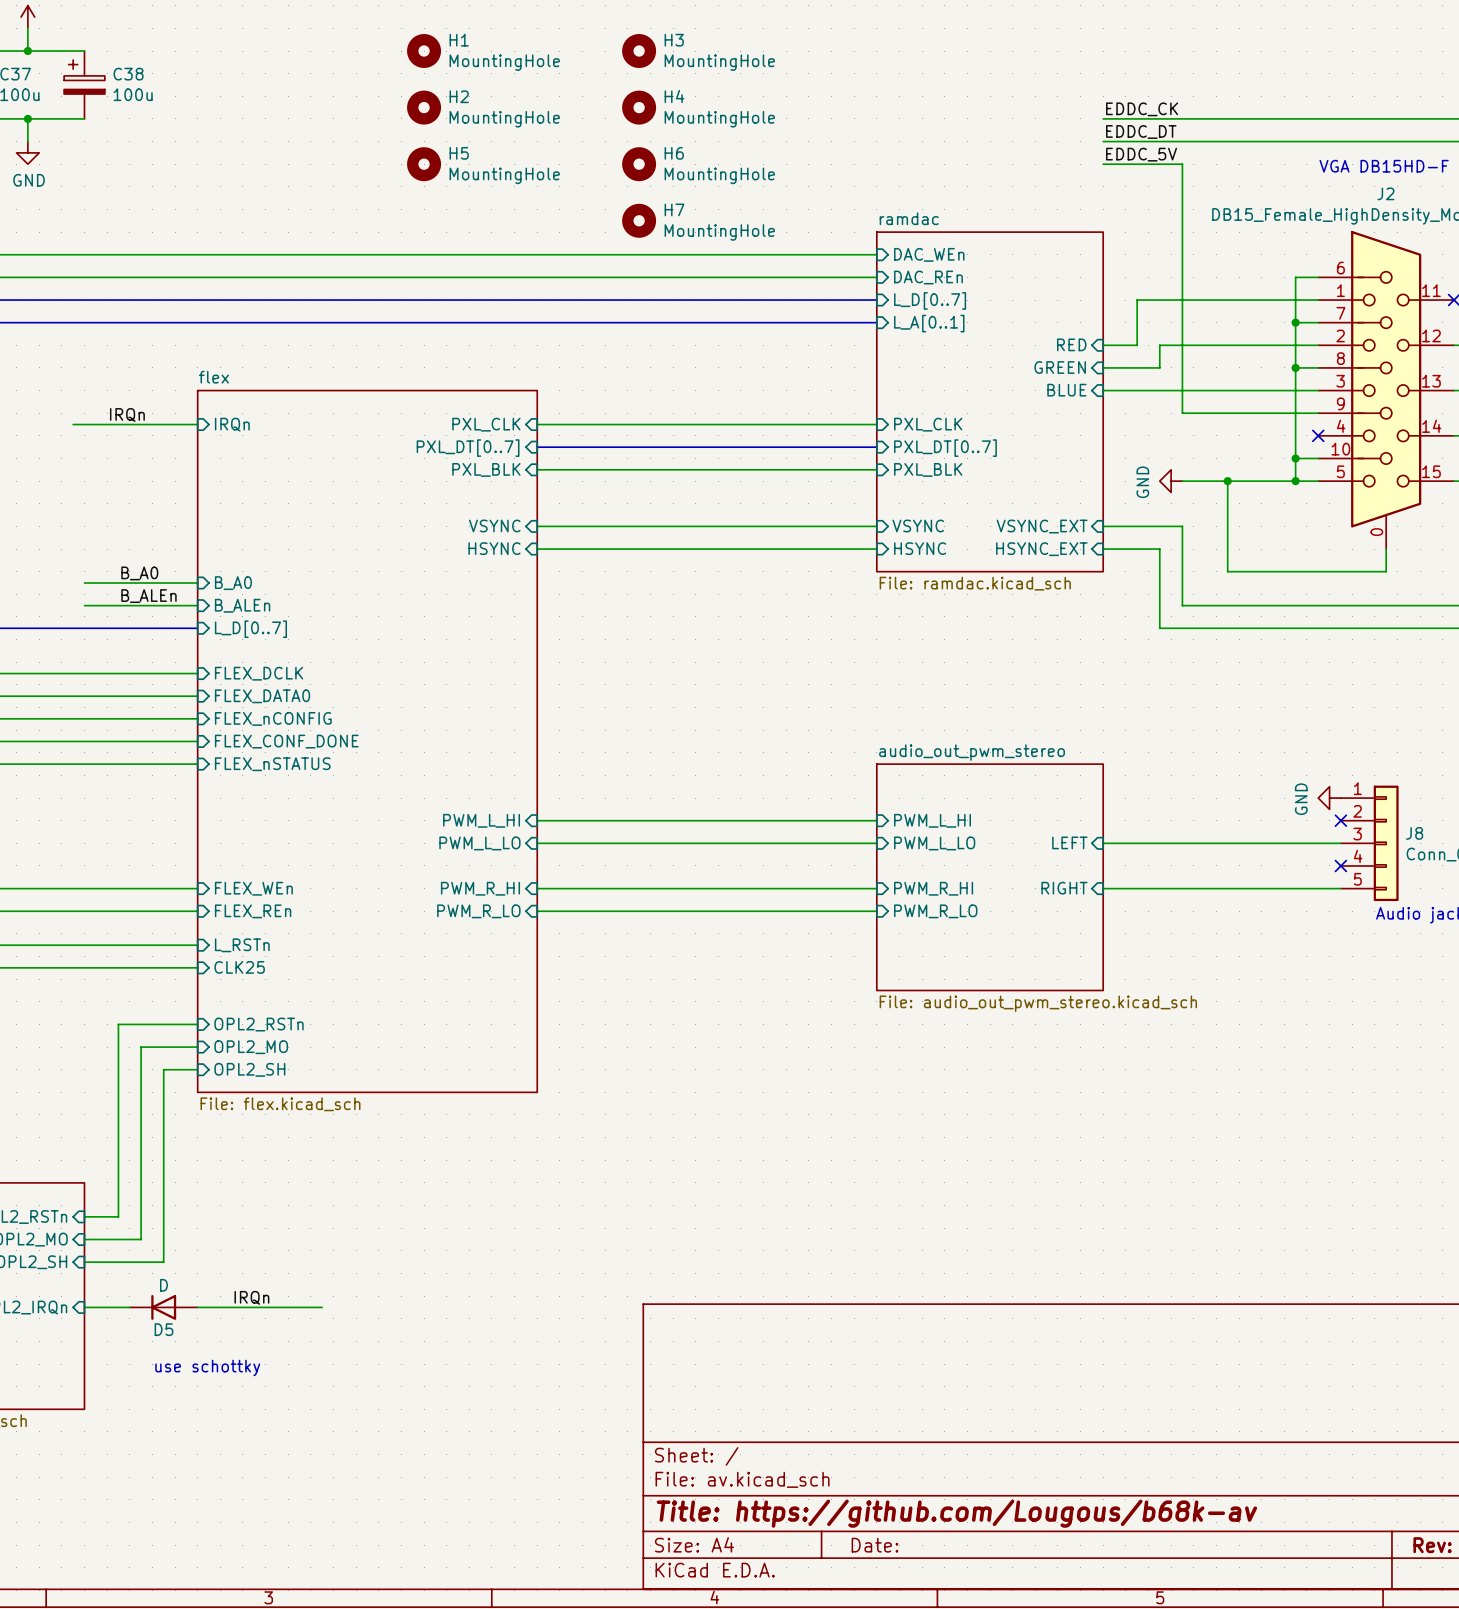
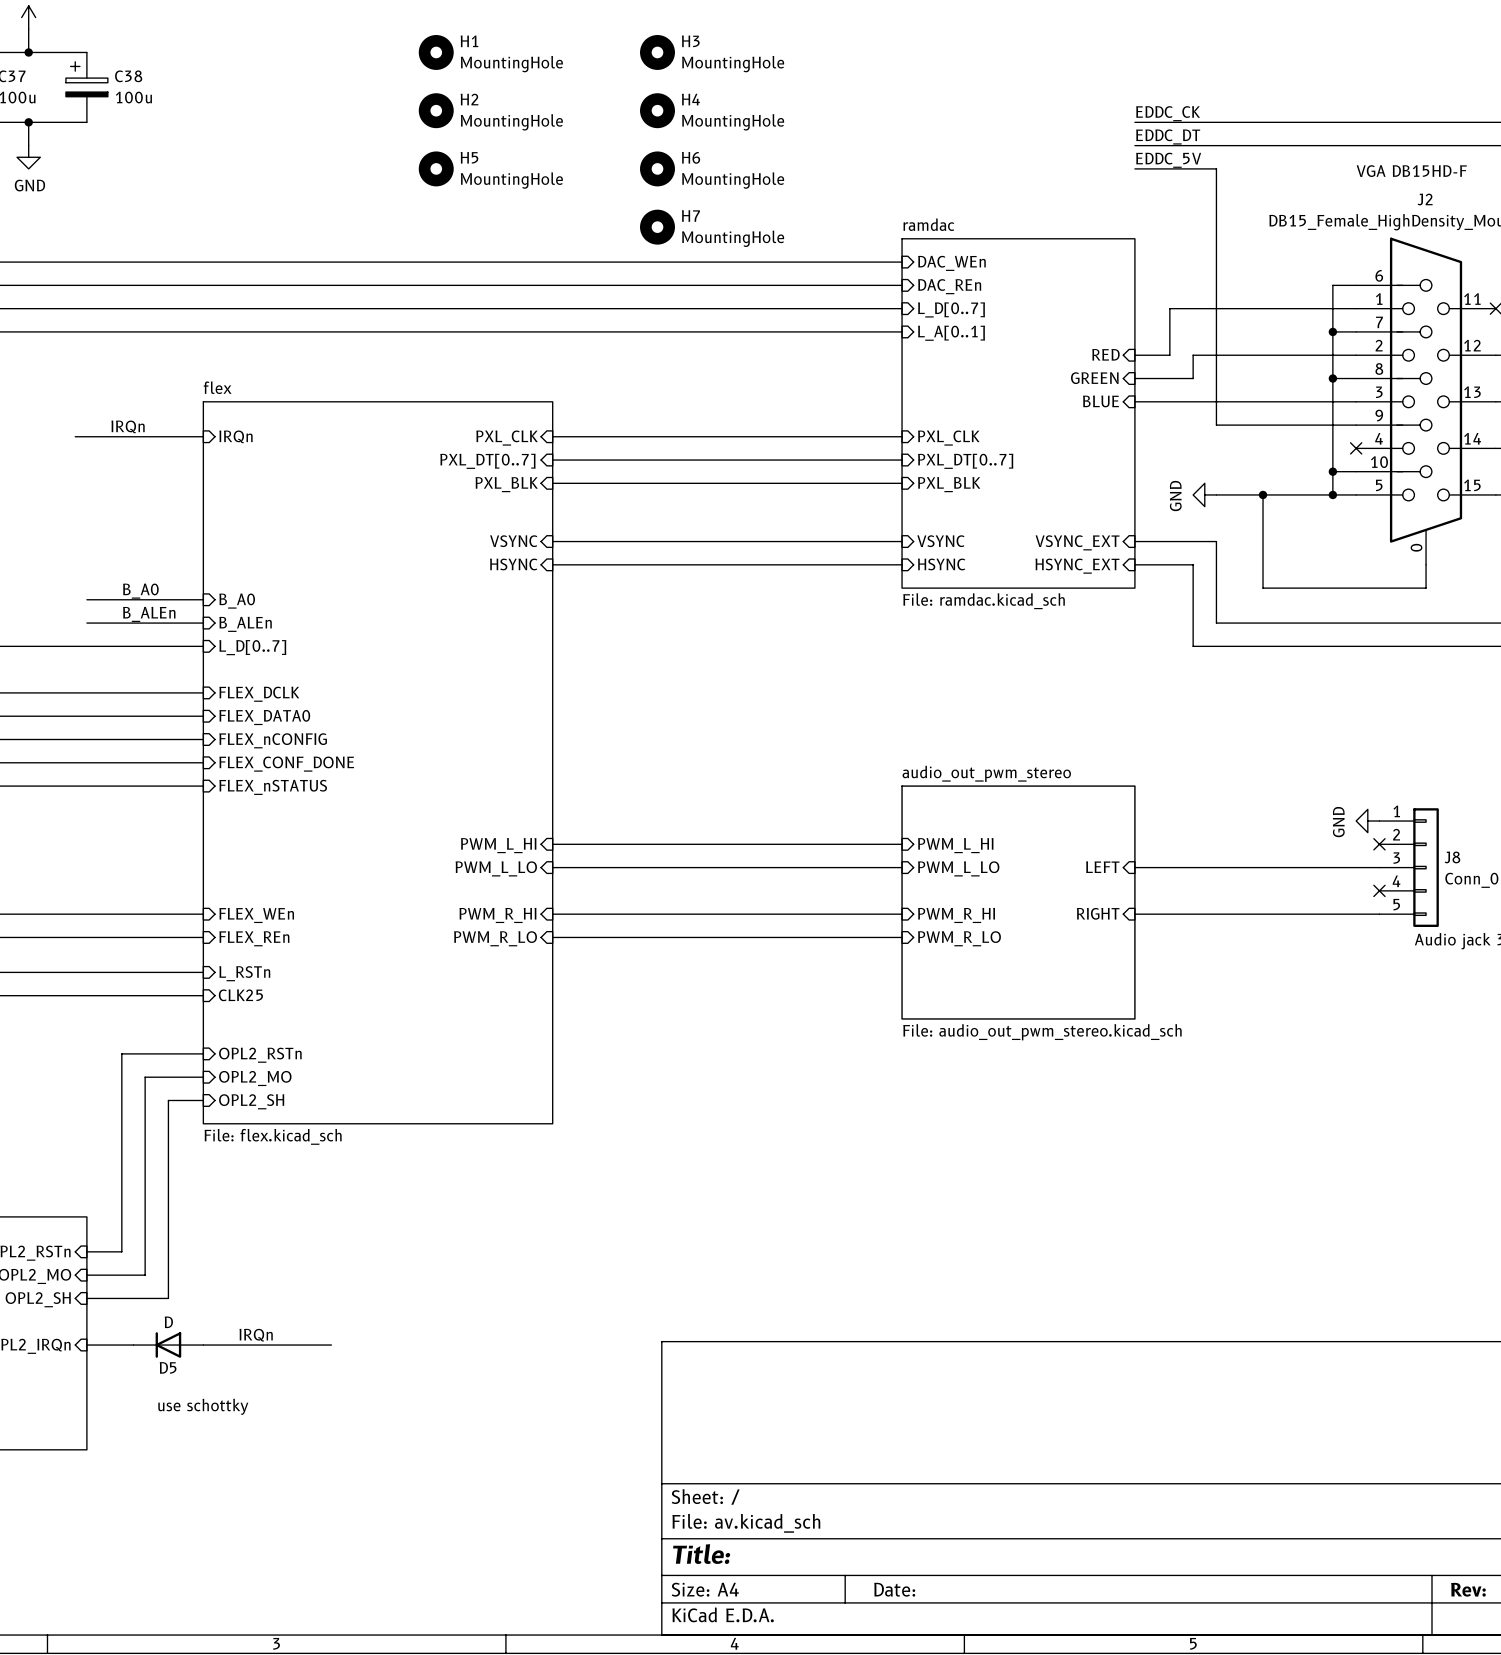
title block: Title: https://github.com/Lougous/b68k-av (956, 1513) -> Title: (701, 1554)

